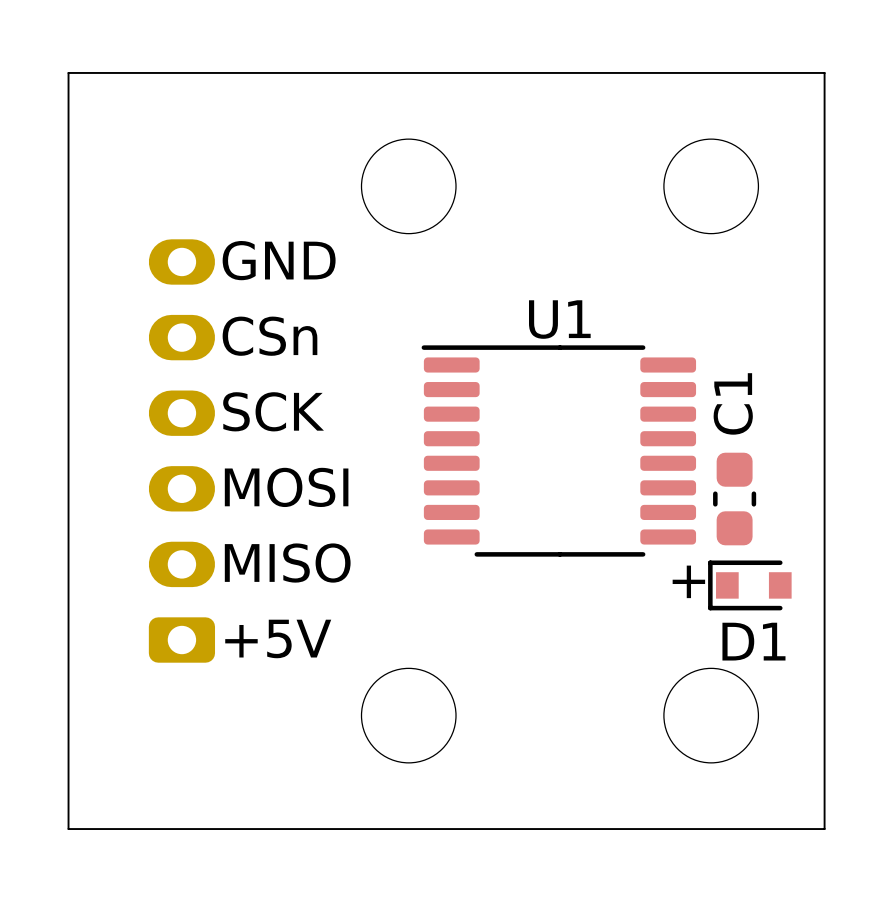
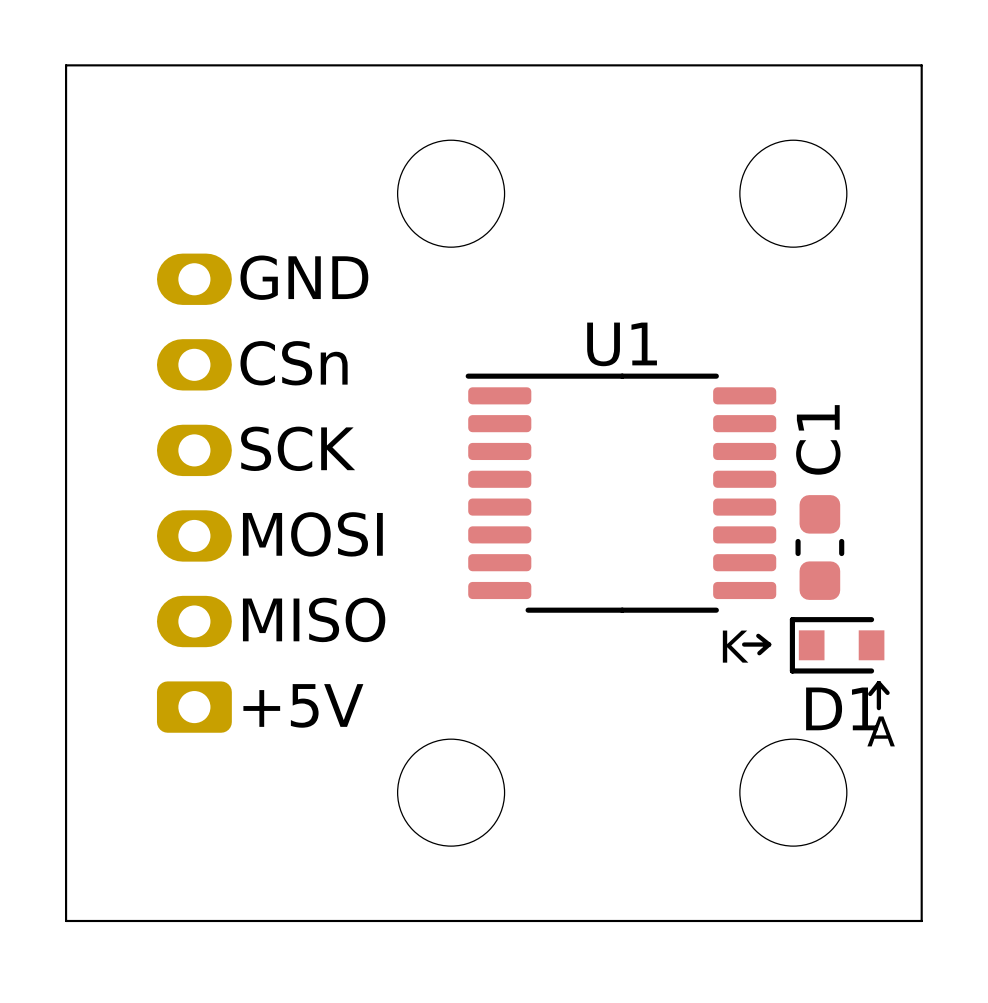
line: none -> (758, 635) (769, 644)
text: + (688, 581) -> none
line: none -> (744, 644) (769, 644)
line: none -> (769, 644) (759, 653)
text: none -> K (735, 646)
line: none -> (878, 683) (870, 693)
line: none -> (878, 683) (887, 692)
line: none -> (878, 683) (878, 708)
text: none -> A (881, 731)

